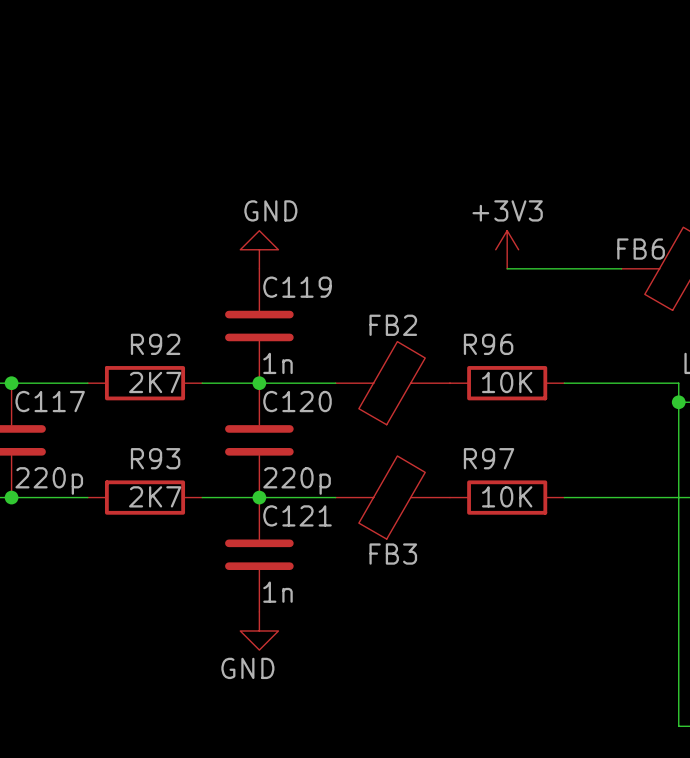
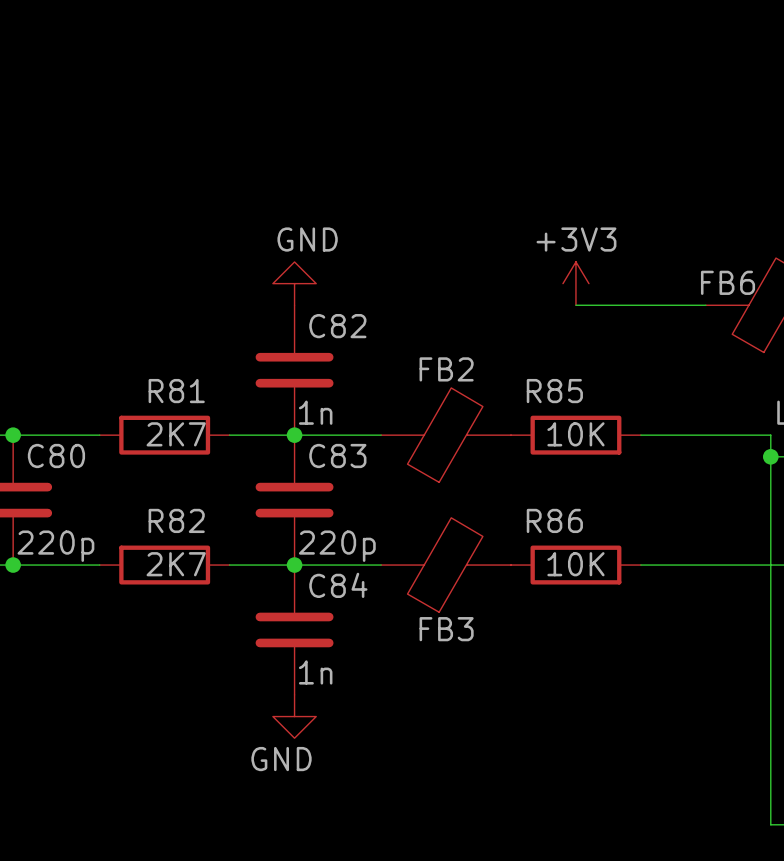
C119 name: C119 (297, 287) -> C82 (337, 326)
R92 name: R92 (155, 344) -> R81 (176, 391)
R96 name: R96 (488, 344) -> R85 (554, 391)
C117 name: C117 (50, 401) -> C80 (56, 455)
C120 name: C120 (297, 401) -> C83 (337, 455)
R93 name: R93 (155, 458) -> R82 (176, 520)
R97 name: R97 (489, 458) -> R86 (554, 520)
C121 name: C121 (297, 515) -> C84 (338, 585)

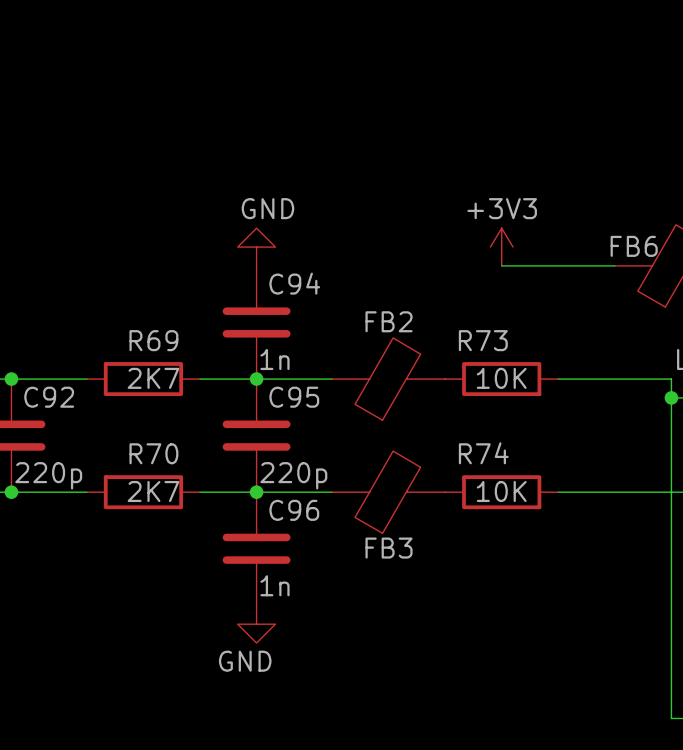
C82 name: C82 (337, 326) -> C94 (294, 283)
R81 name: R81 (176, 391) -> R69 (153, 340)
R85 name: R85 (554, 391) -> R73 (483, 340)
C80 name: C80 (56, 455) -> C92 (49, 397)
C83 name: C83 (337, 455) -> C95 (294, 397)
R82 name: R82 (176, 520) -> R70 (153, 453)
R86 name: R86 (554, 520) -> R74 (483, 453)
C84 name: C84 (338, 585) -> C96 (294, 510)

